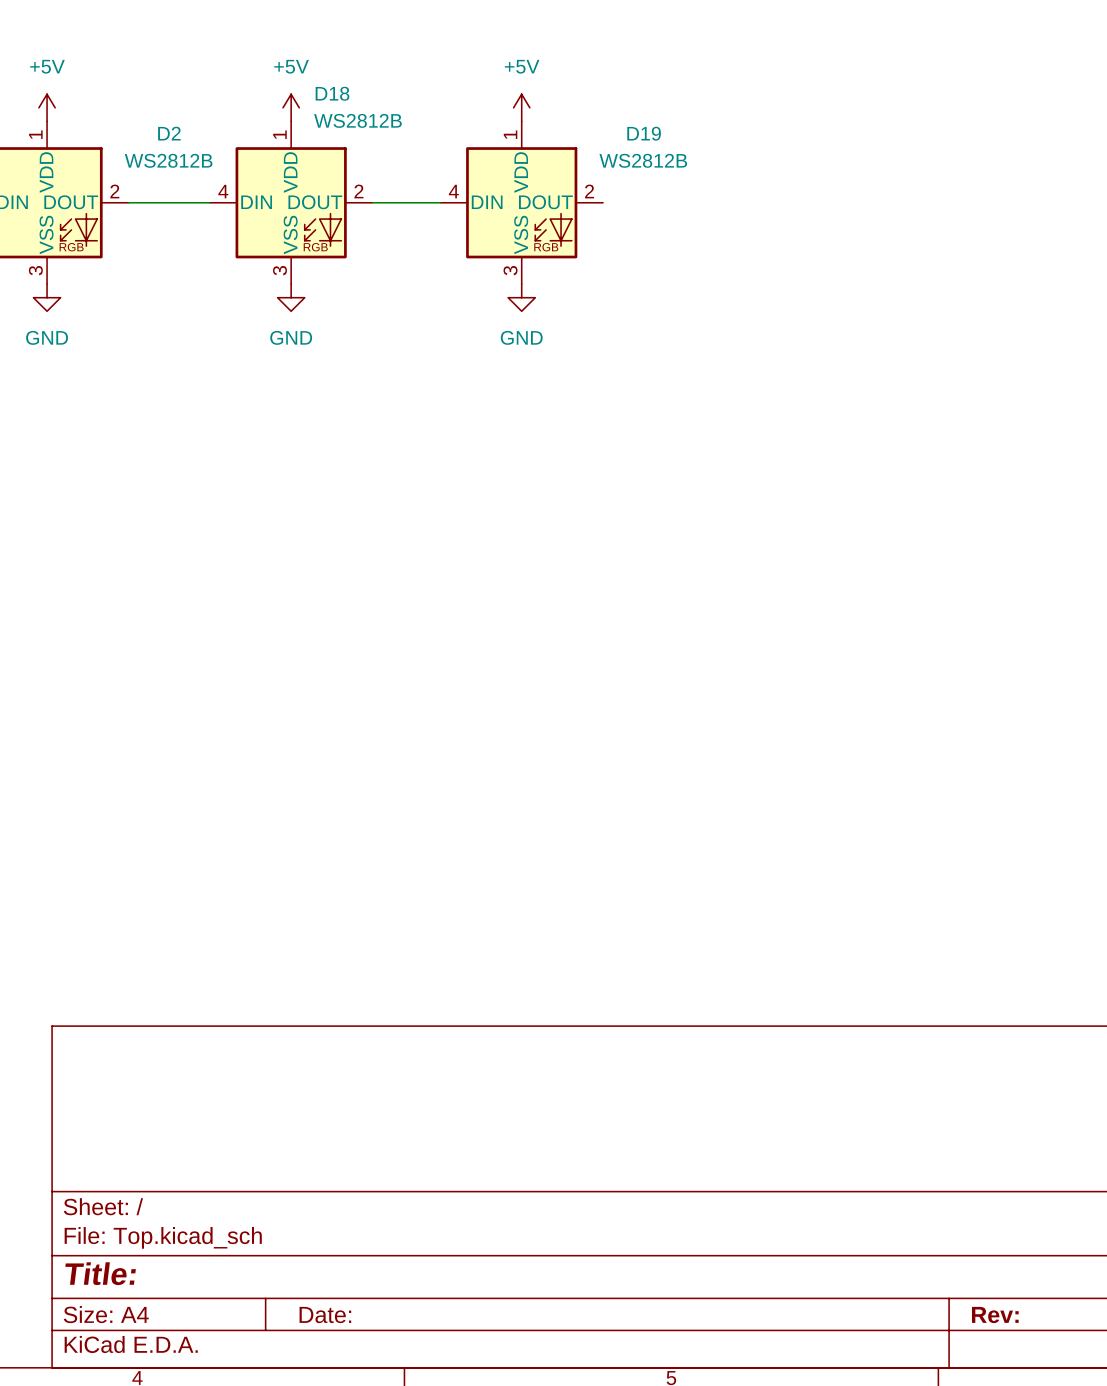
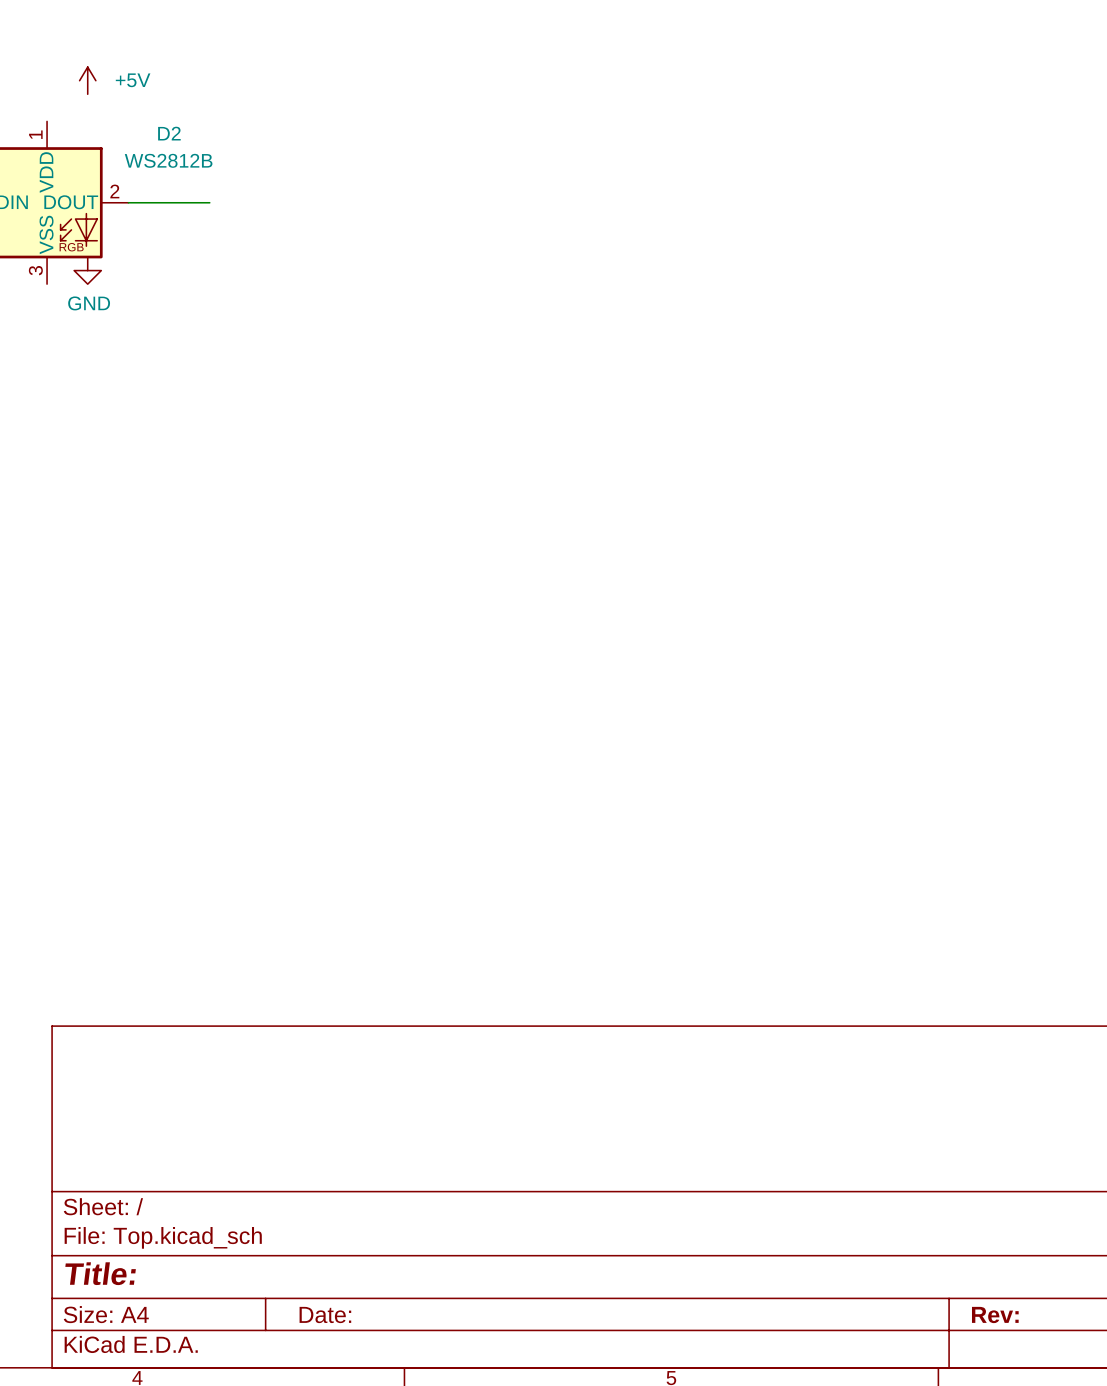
power symbol text position: +5V (47, 66) -> +5V (133, 80)
power symbol position: +5V (47, 107) -> +5V (87, 80)
power symbol: +5V (291, 107) -> none
power symbol: +5V (521, 107) -> none
D18: WS2812B (291, 202) -> none
wire: (372, 202) (440, 202) -> none
D19: WS2812B (521, 202) -> none
power symbol position: GND (47, 297) -> GND (87, 270)
power symbol: GND (291, 297) -> none
power symbol: GND (521, 297) -> none
power symbol text position: GND (47, 337) -> GND (89, 303)

